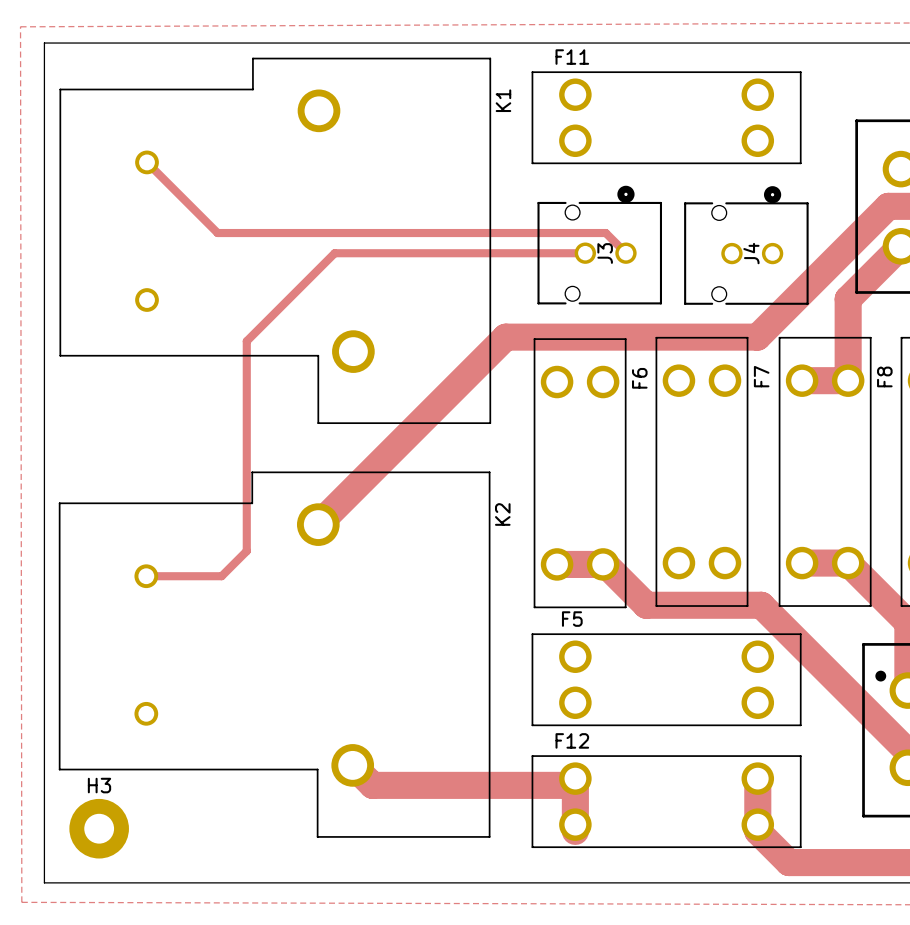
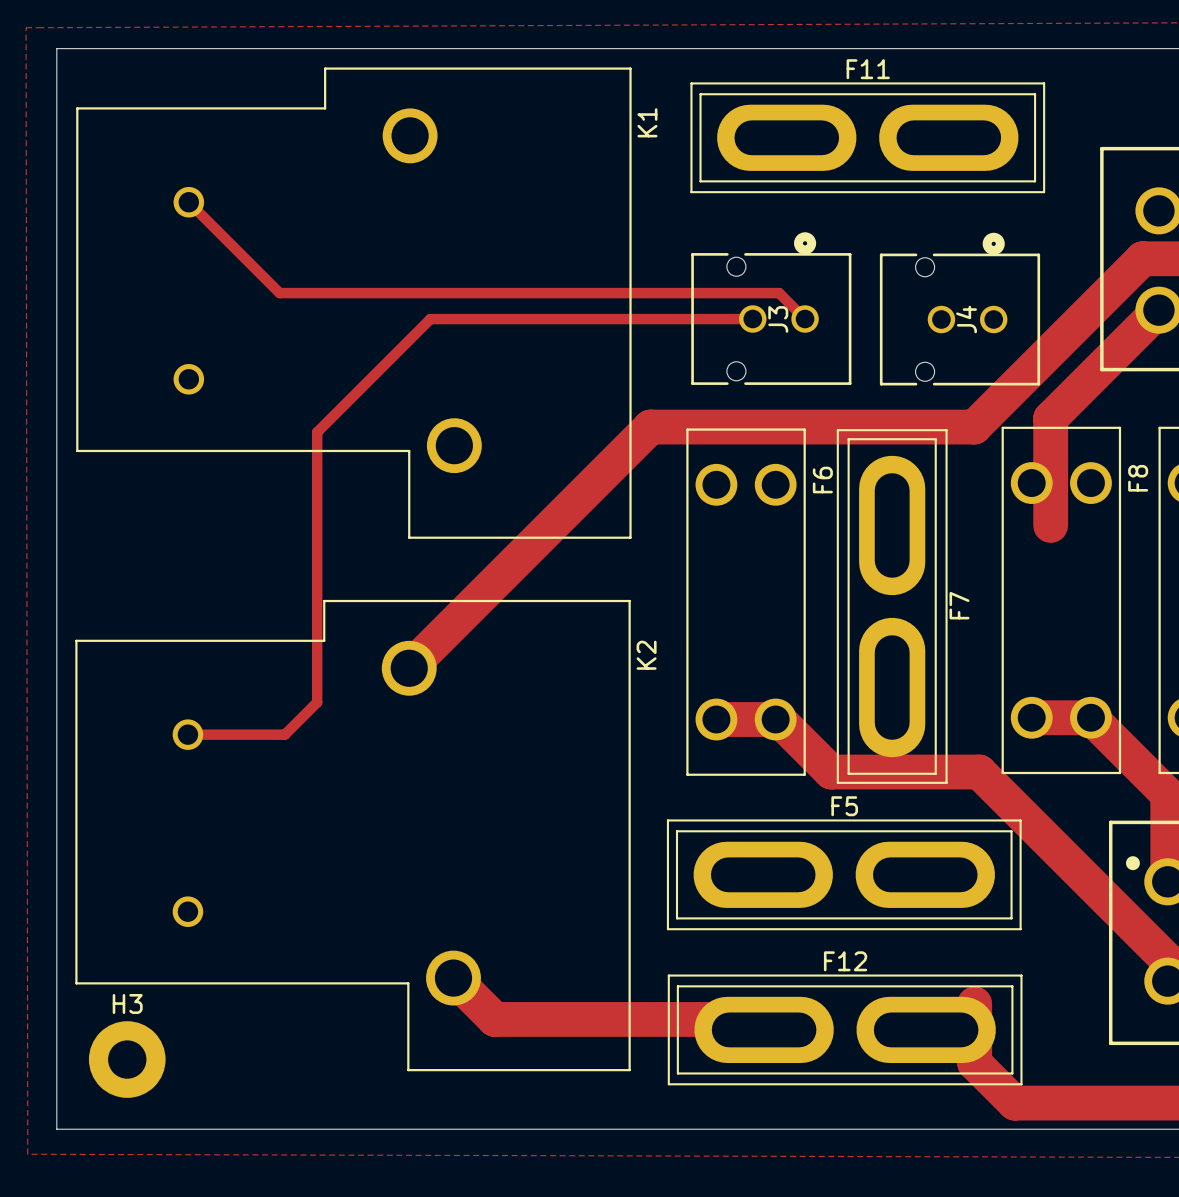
F11 name position: F11 (572, 57) -> F11 (868, 69)
F11 footprint: [531, 71, 802, 165] -> [690, 82, 1046, 194]
track: (848, 299) (848, 380) (802, 380) -> (1090, 378) (1050, 418) (1050, 525)
F7 footprint: [655, 336, 749, 607] -> [836, 429, 948, 784]
F7 name position: F7 (761, 376) -> F7 (959, 605)
F5 name position: F5 (572, 619) -> F5 (844, 806)
F5 footprint: [531, 633, 802, 727] -> [666, 819, 1022, 931]
F12 name position: F12 (572, 740) -> F12 (845, 961)
F12 footprint: [531, 755, 802, 849] -> [667, 974, 1023, 1086]
track: (372, 785) (575, 785) (575, 831) -> (479, 1003) (494, 1019) (753, 1019) (764, 1029)

